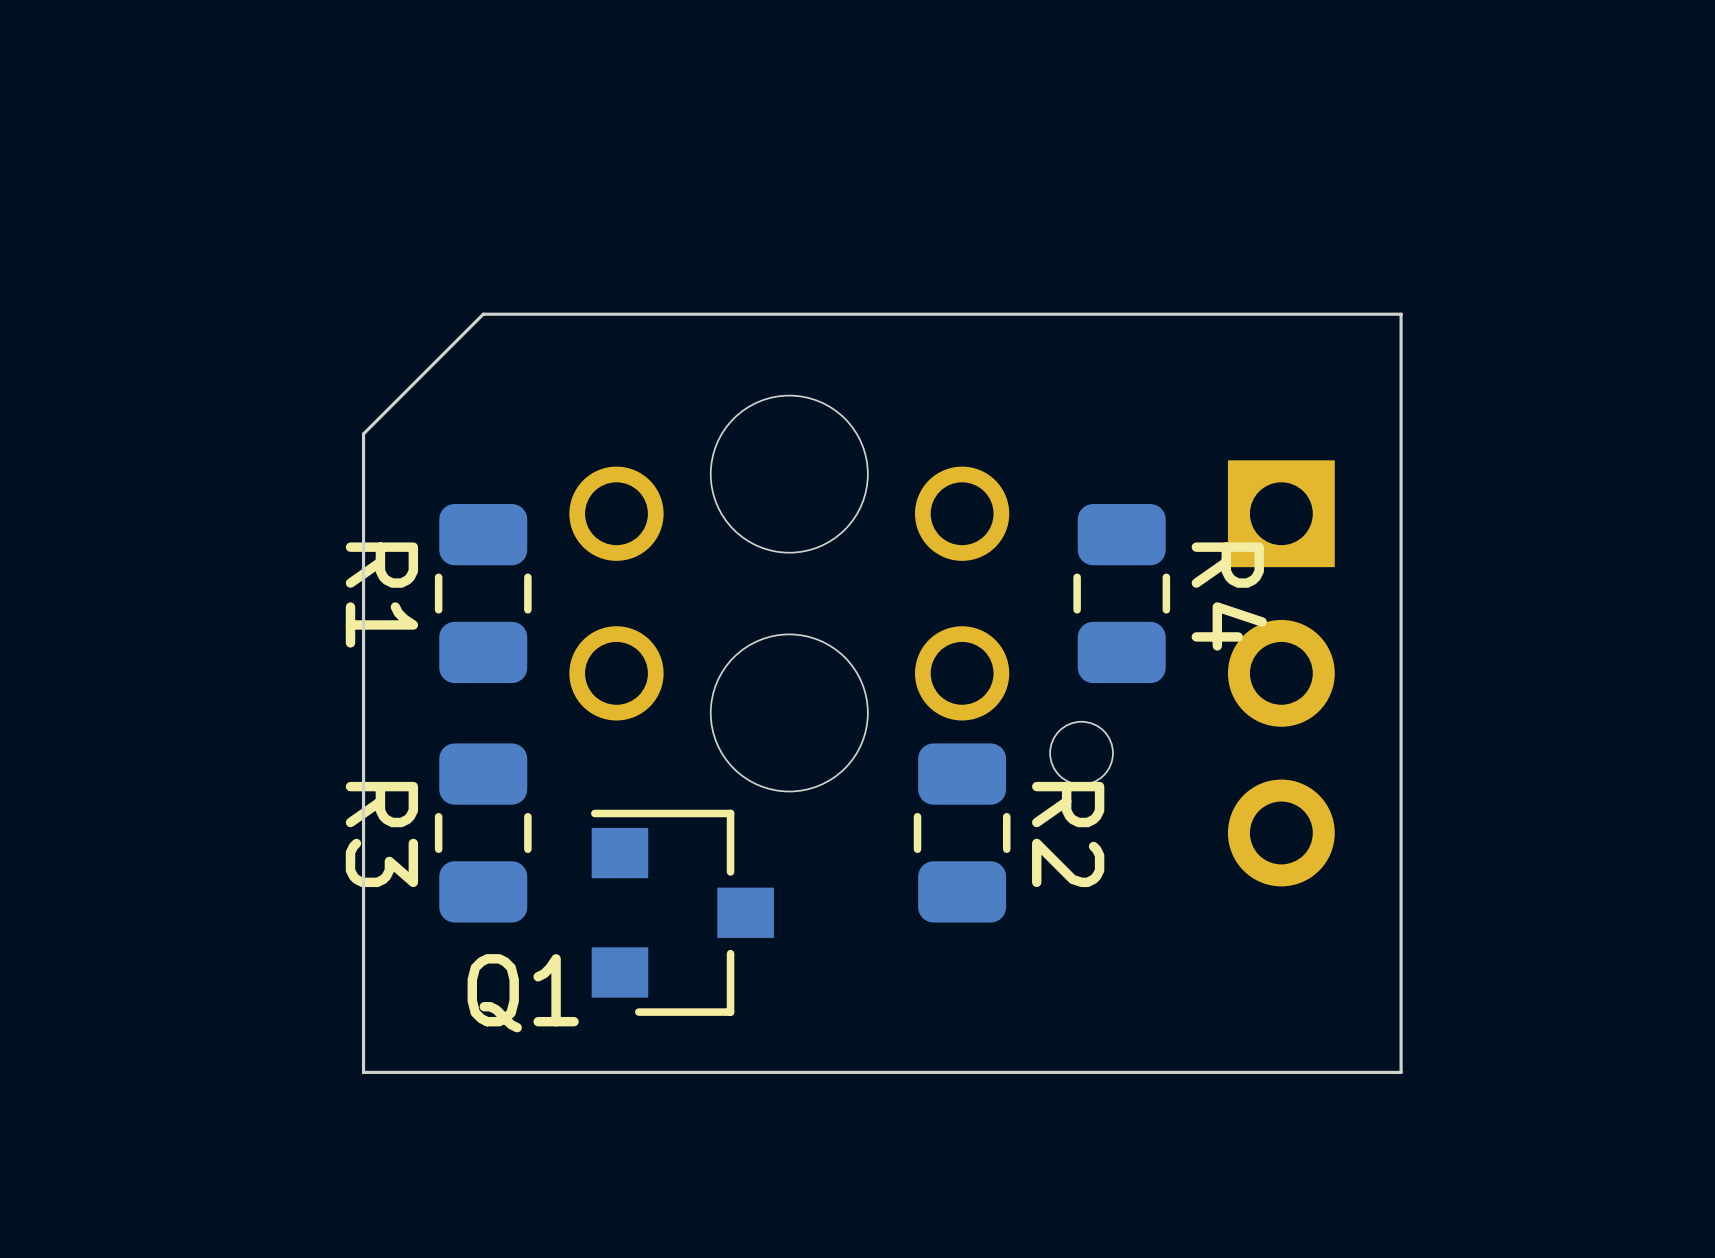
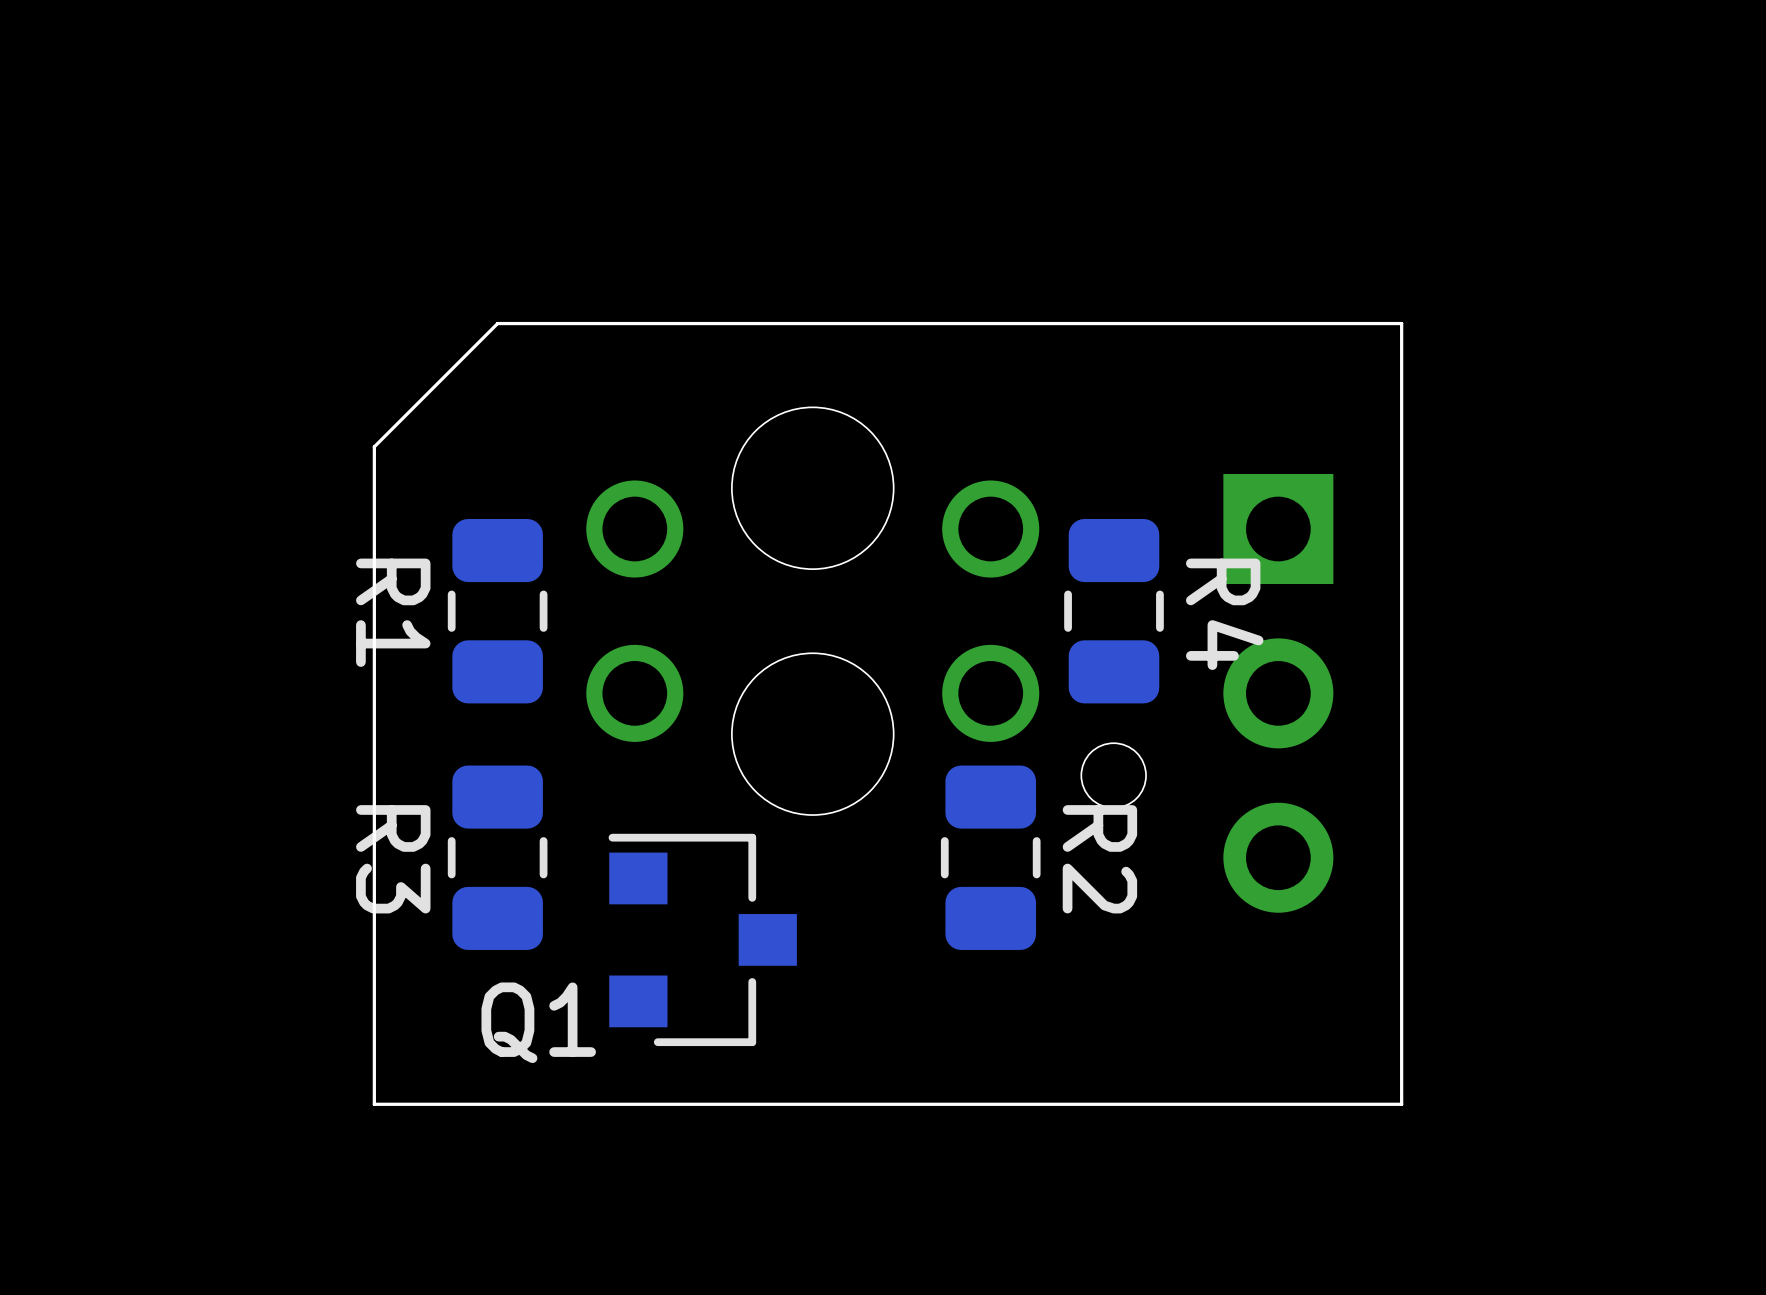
board edge: (1361, 314) (1401, 314) (1401, 1072) (1361, 1072) -> (1401, 323) (1401, 1104)
R4 position: (1121, 593) -> (1114, 611)
part position: (1281, 673) -> (1278, 693)

